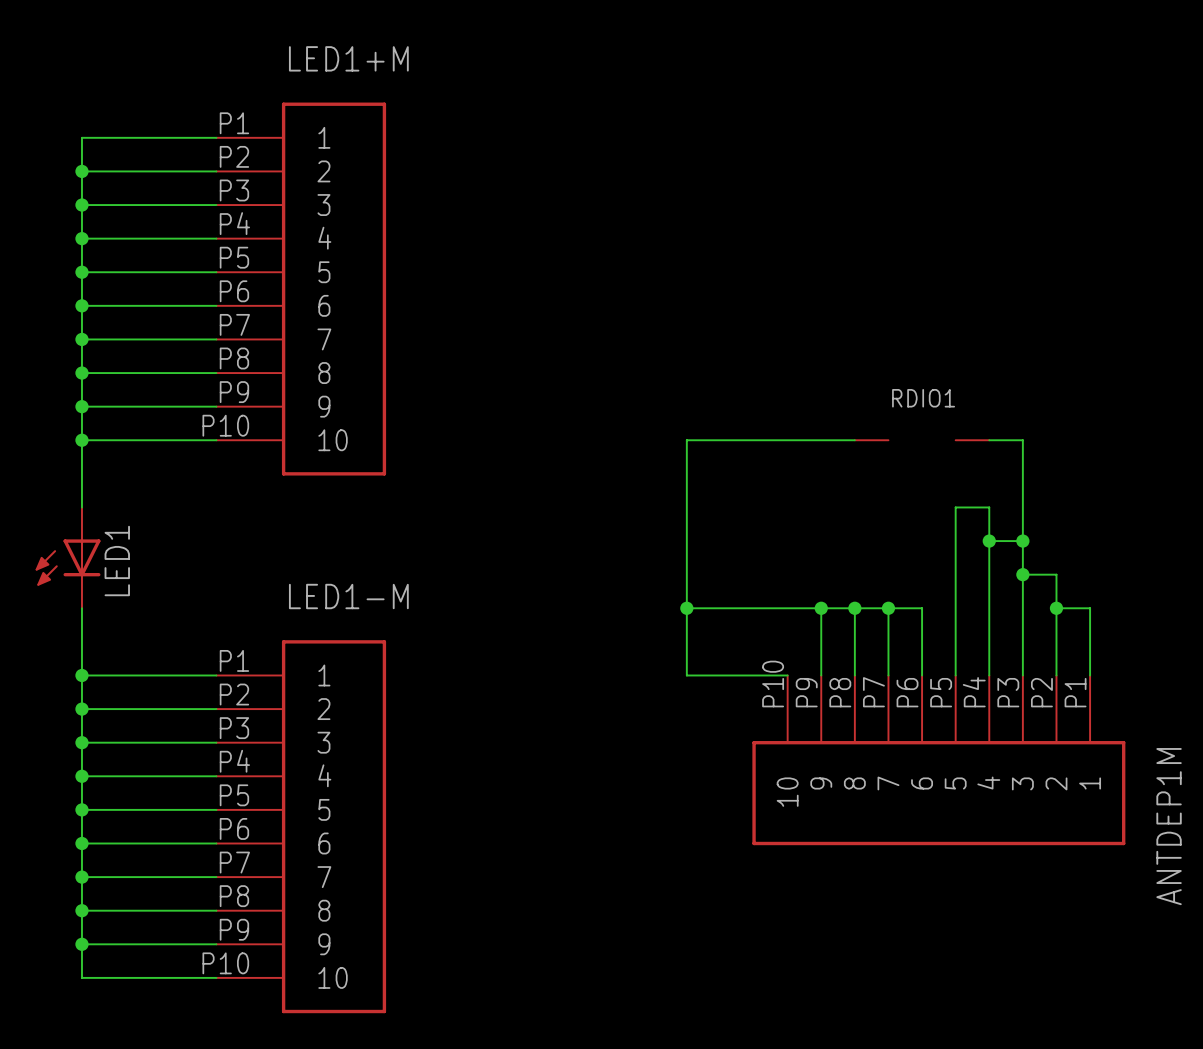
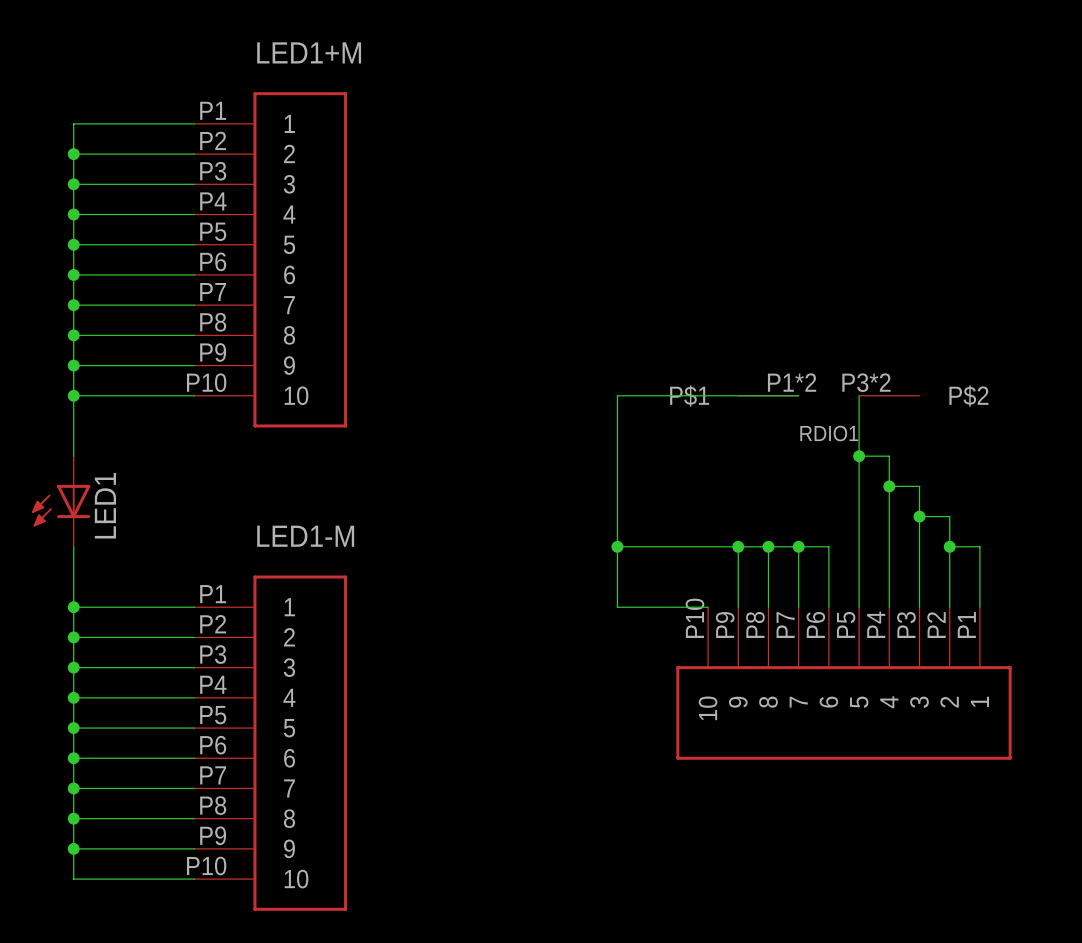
RDIO1 name position: RDIO1 (923, 398) -> RDIO1 (829, 433)
RDIO1 symbol: [854, 440, 990, 441] -> [738, 395, 920, 396]
wire: none -> (859, 395) (859, 456)
wire: (989, 440) (1022, 440) (1022, 541) -> none
junction position: (1022, 541) -> (859, 456)
ANTDEP1M name: ANTDEP1M (1169, 826) -> none

